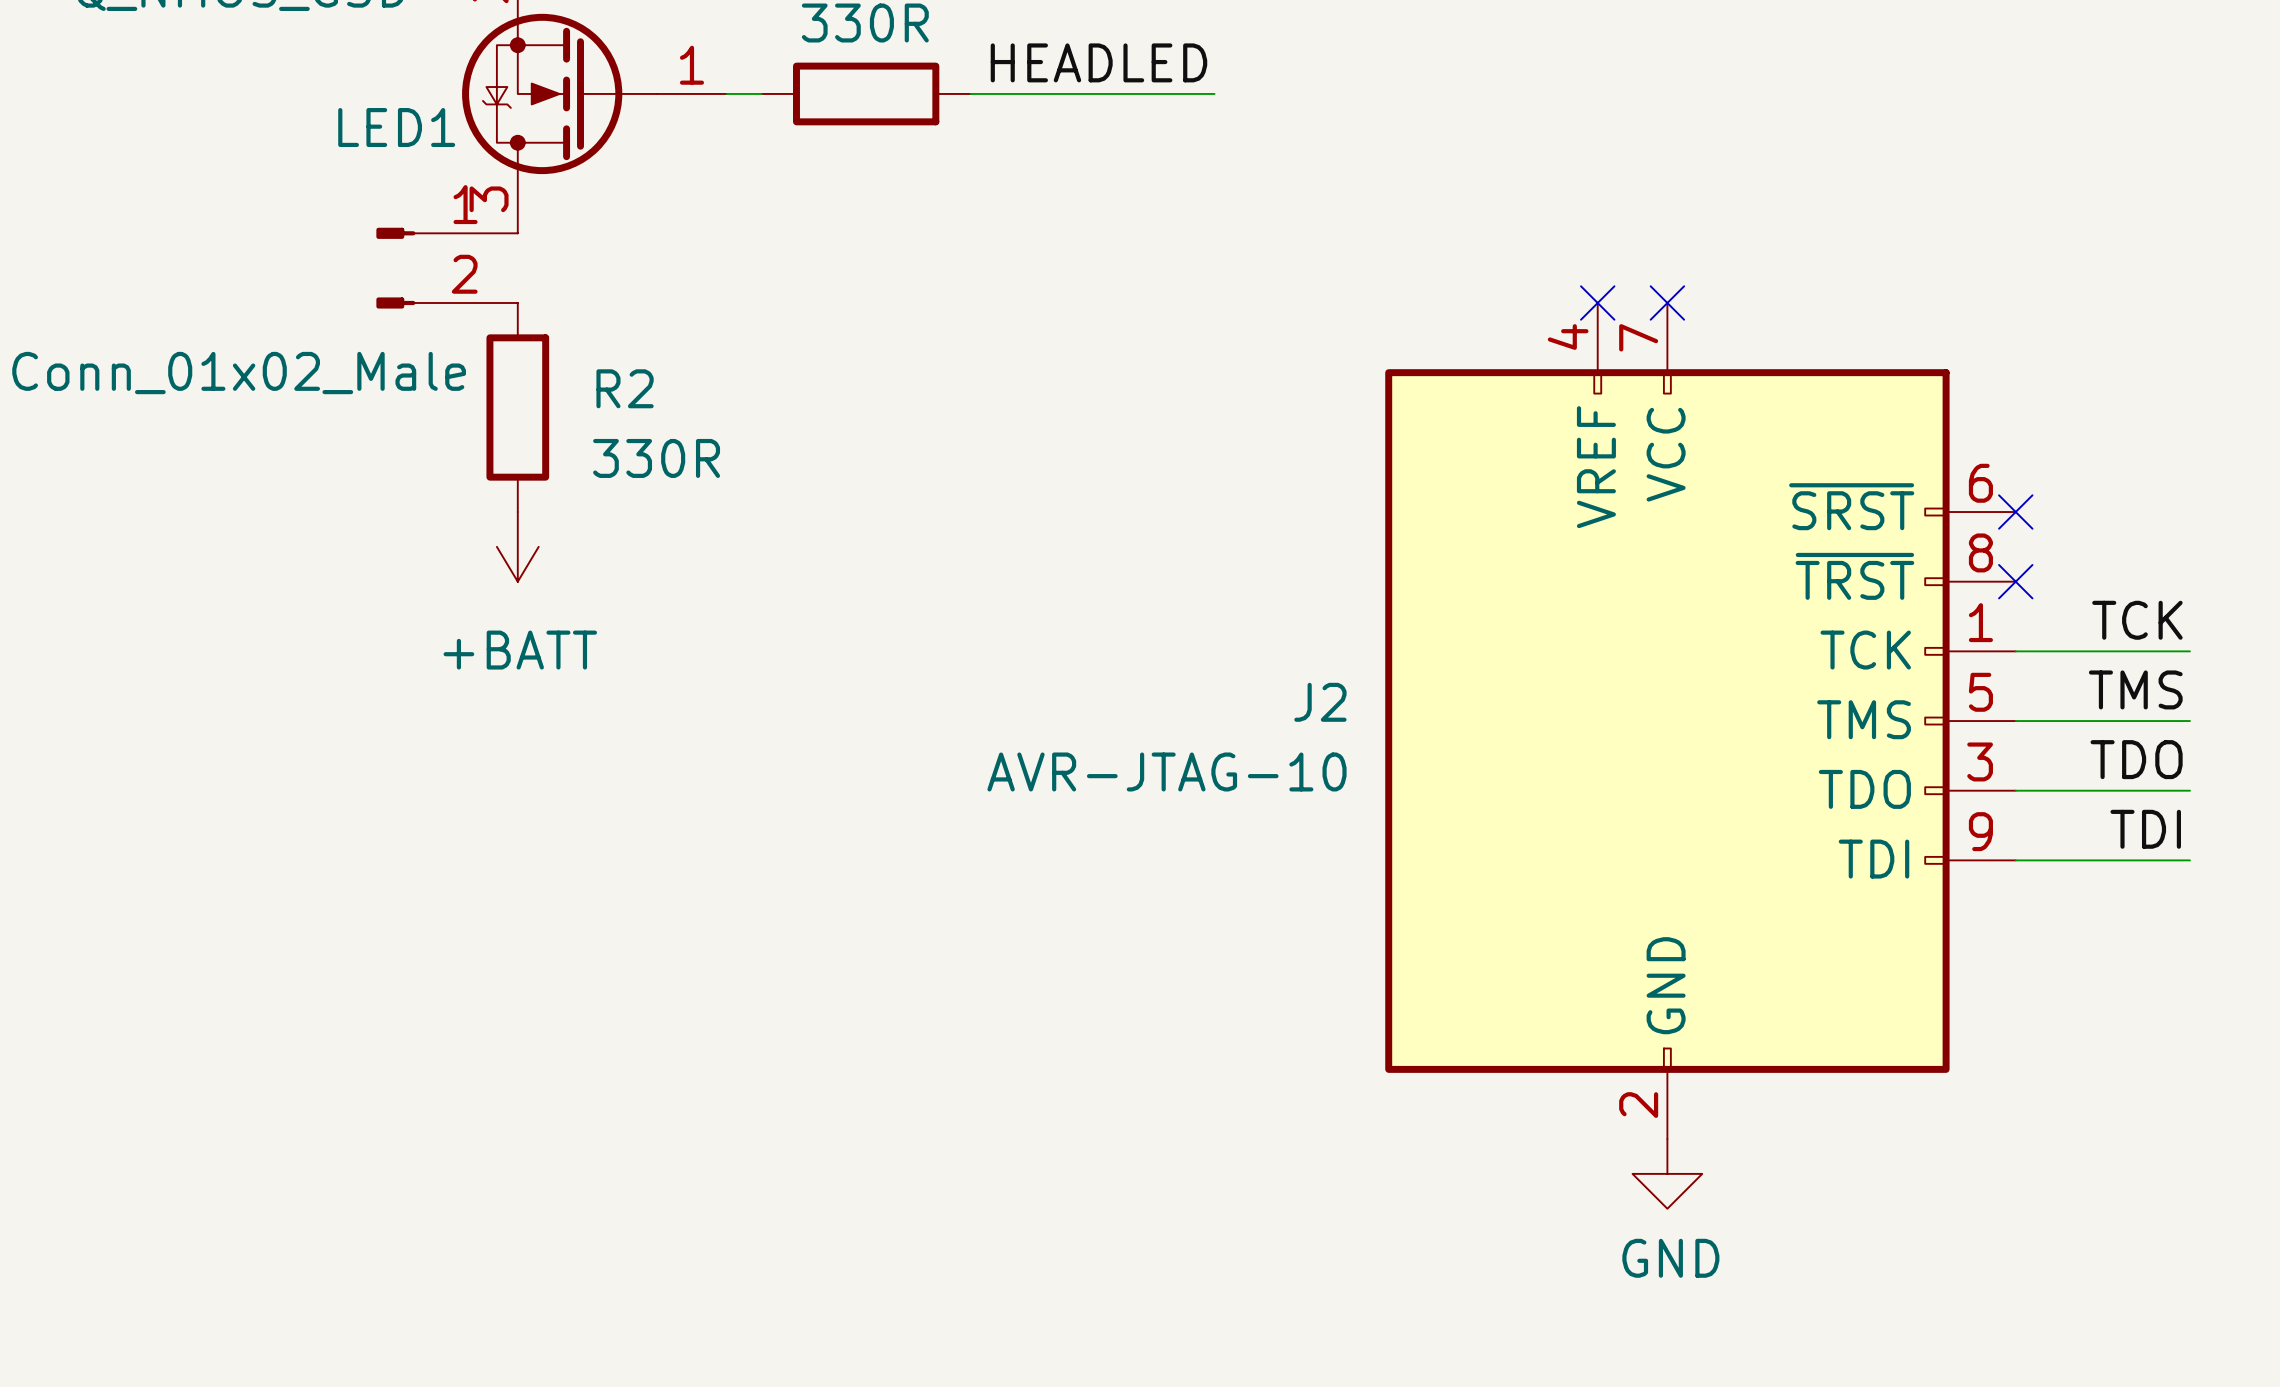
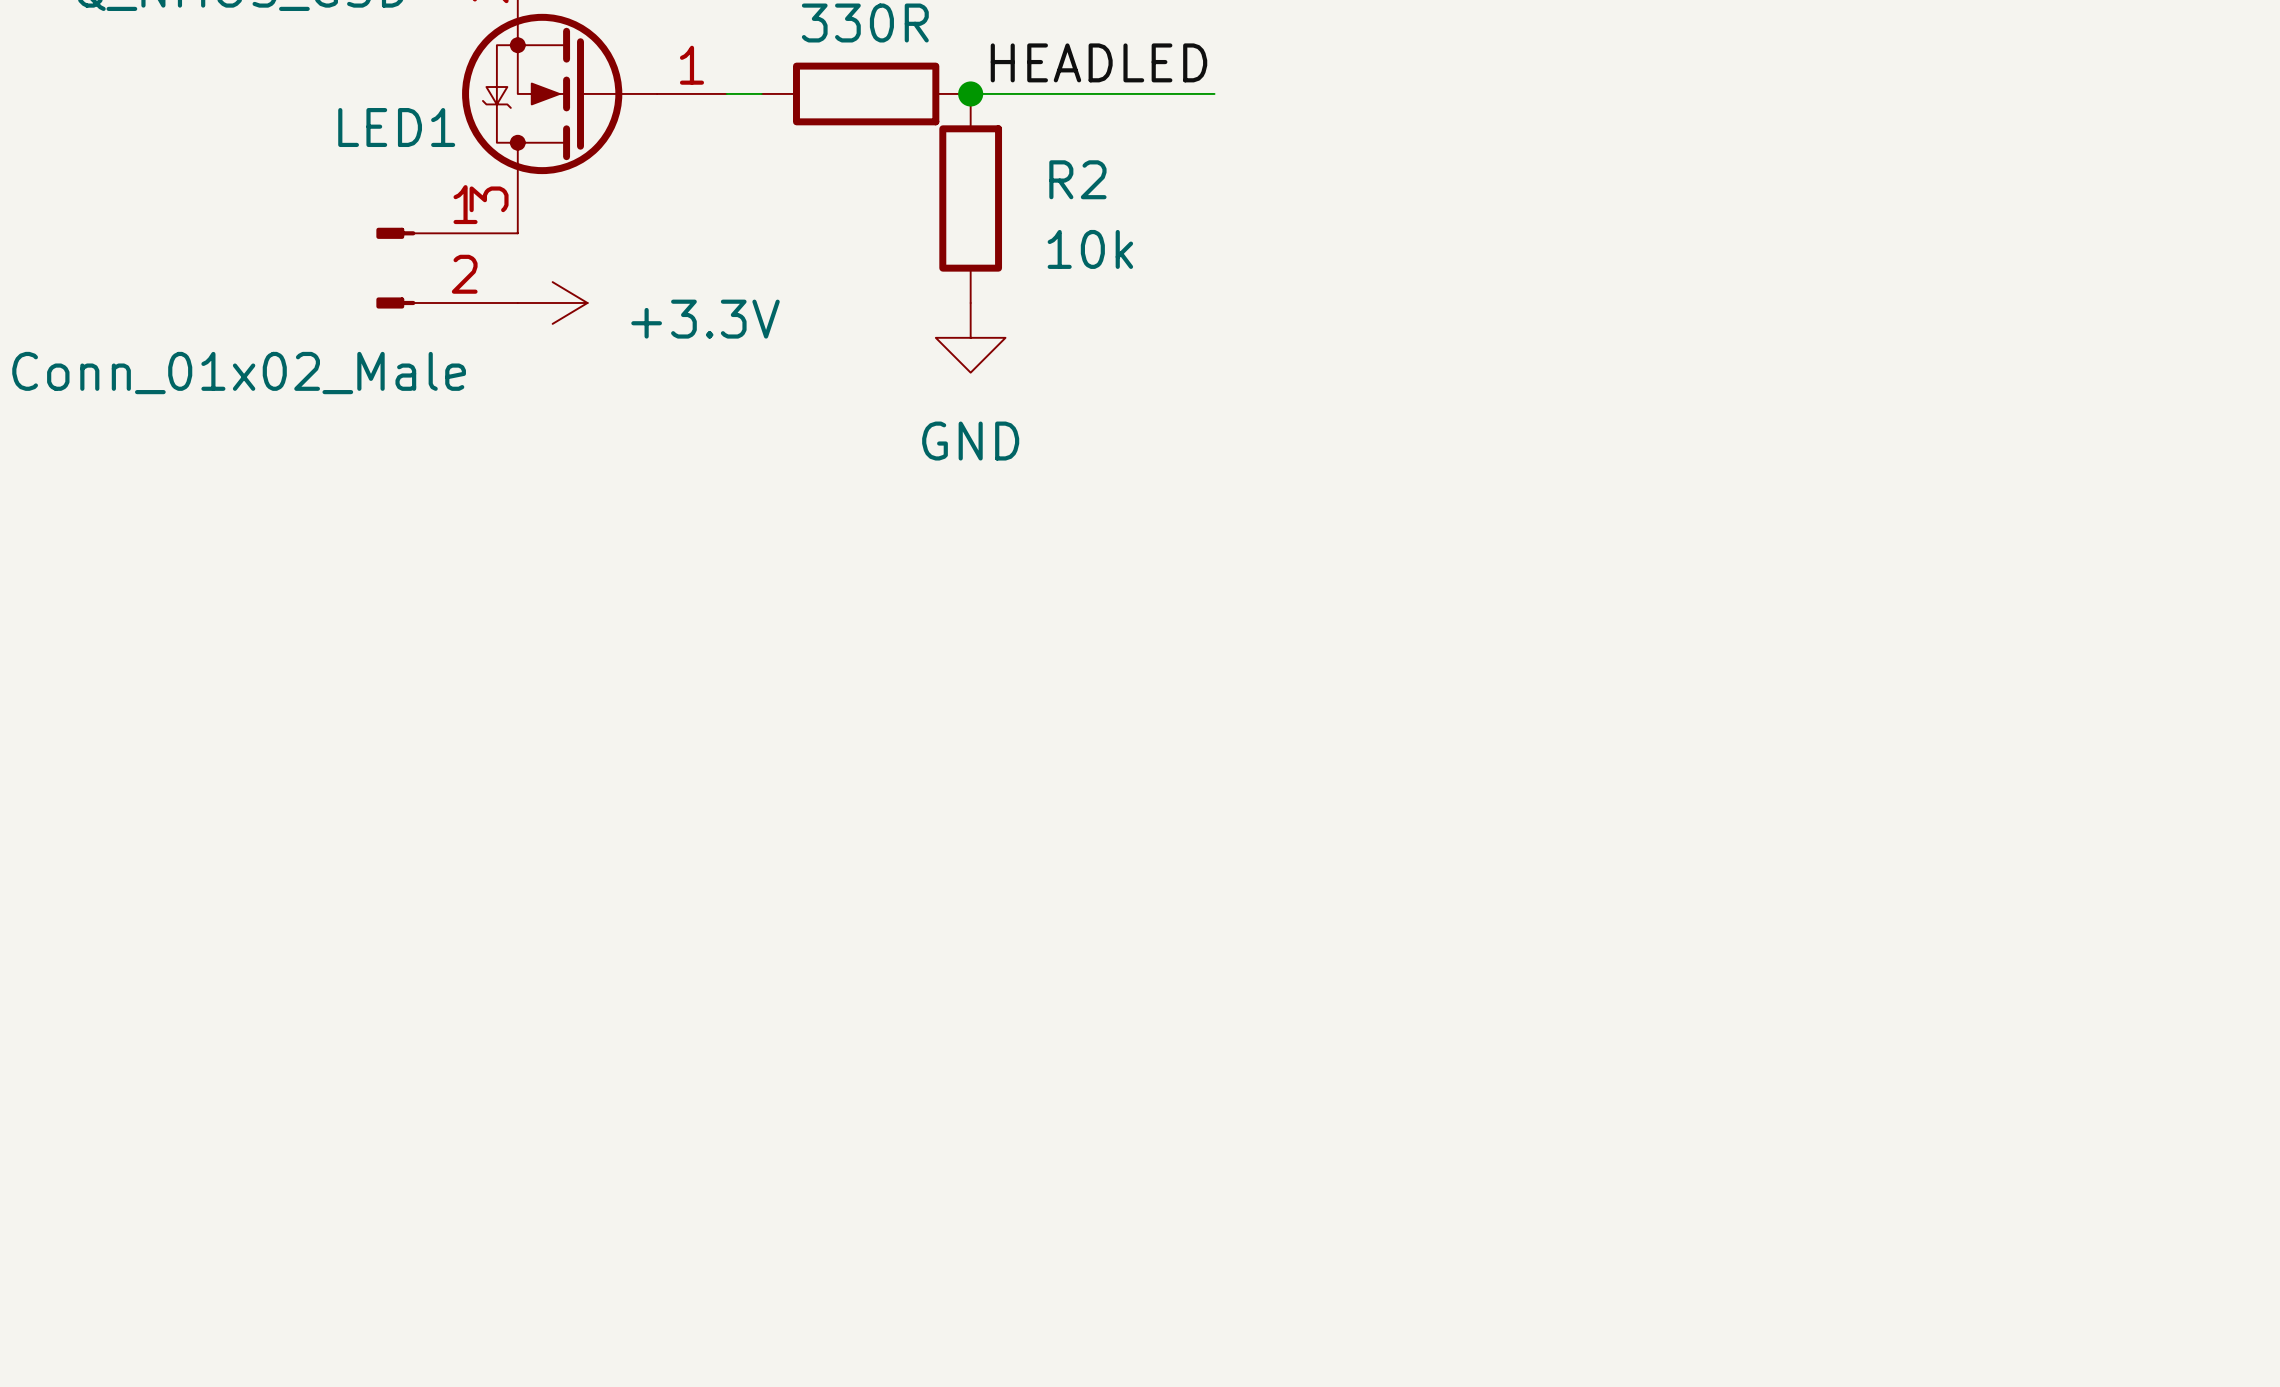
junction: none -> (970, 93)
power symbol: none -> +3.3V (552, 302)
no-connect mark: (1597, 302) -> none
no-connect mark: (1667, 302) -> none
power symbol: none -> GND (970, 337)
R2 position: (517, 407) -> (970, 198)
R2 value: 330R (656, 458) -> 10k (1090, 249)
no-connect mark: (2015, 512) -> none
power symbol: +BATT (517, 546) -> none
no-connect mark: (2015, 581) -> none
label: TCK (2137, 620) -> none
wire: (2015, 651) (2189, 651) -> none
label: TMS (2135, 689) -> none
J2: AVR-JTAG-10 (1700, 721) -> none
wire: (2015, 721) (2189, 721) -> none
label: TDO (2136, 759) -> none
wire: (2015, 790) (2189, 790) -> none
label: TDI (2145, 829) -> none
wire: (2015, 860) (2189, 860) -> none
power symbol: GND (1667, 1173) -> none

